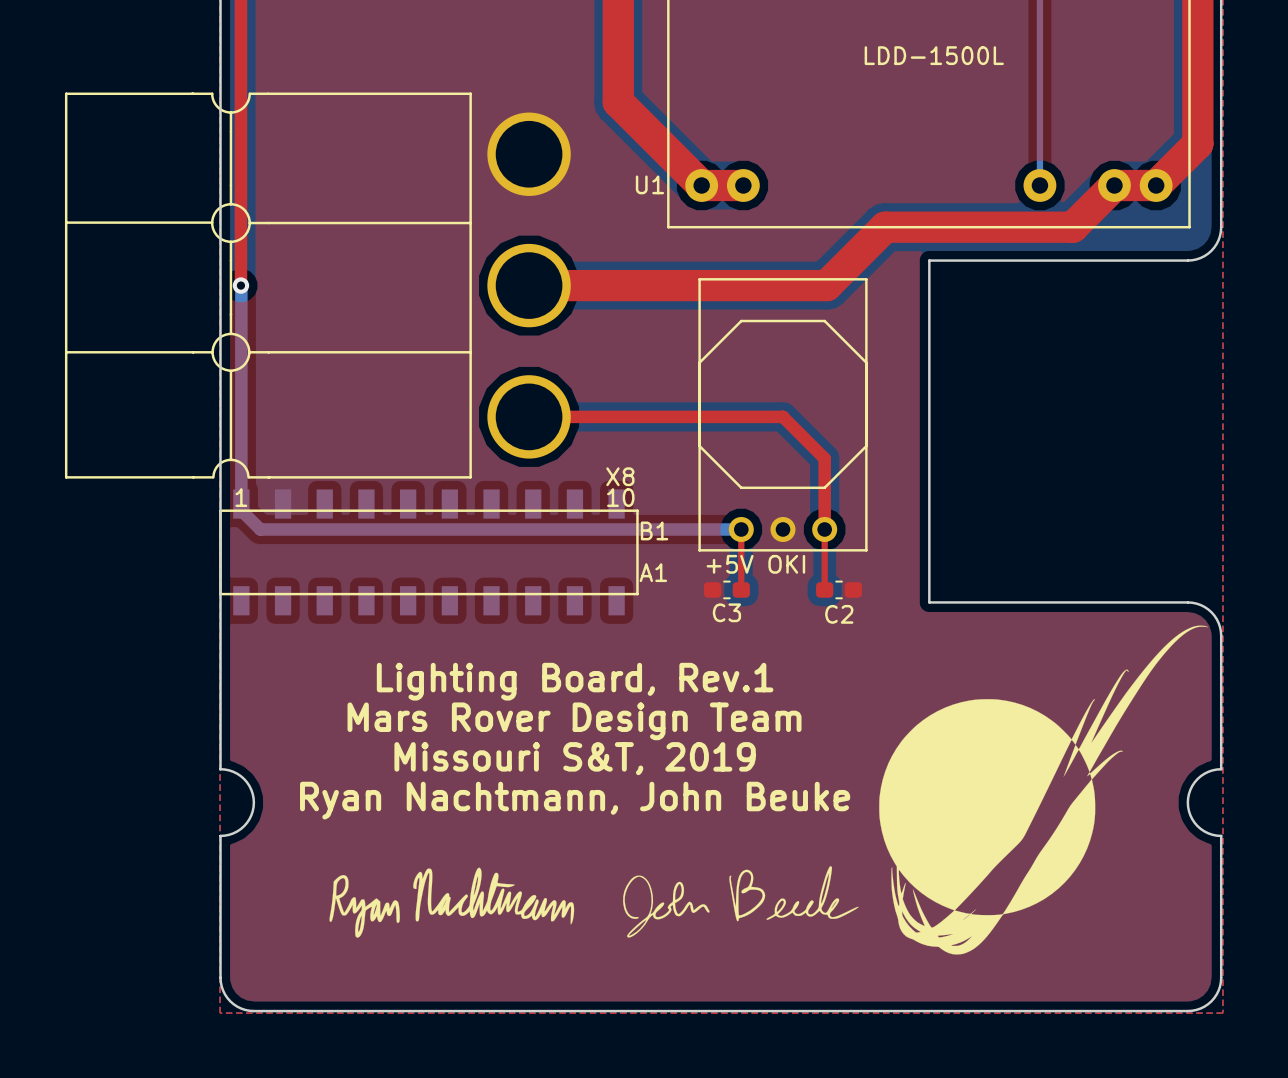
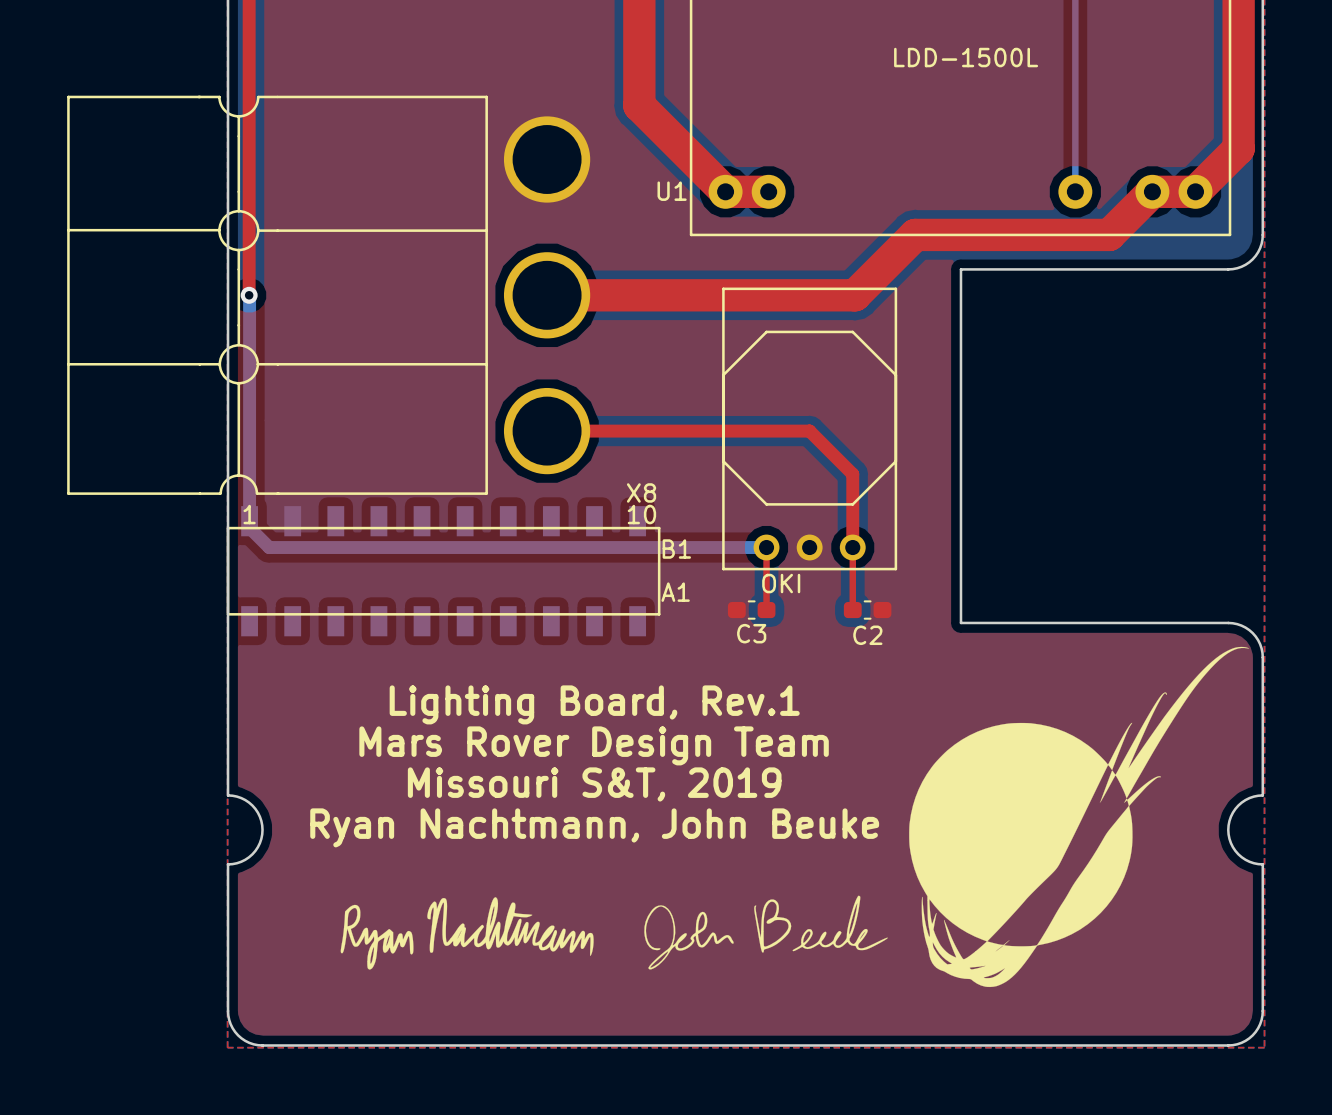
part value: +5V OKI (755, 564) -> OKI (781, 583)

